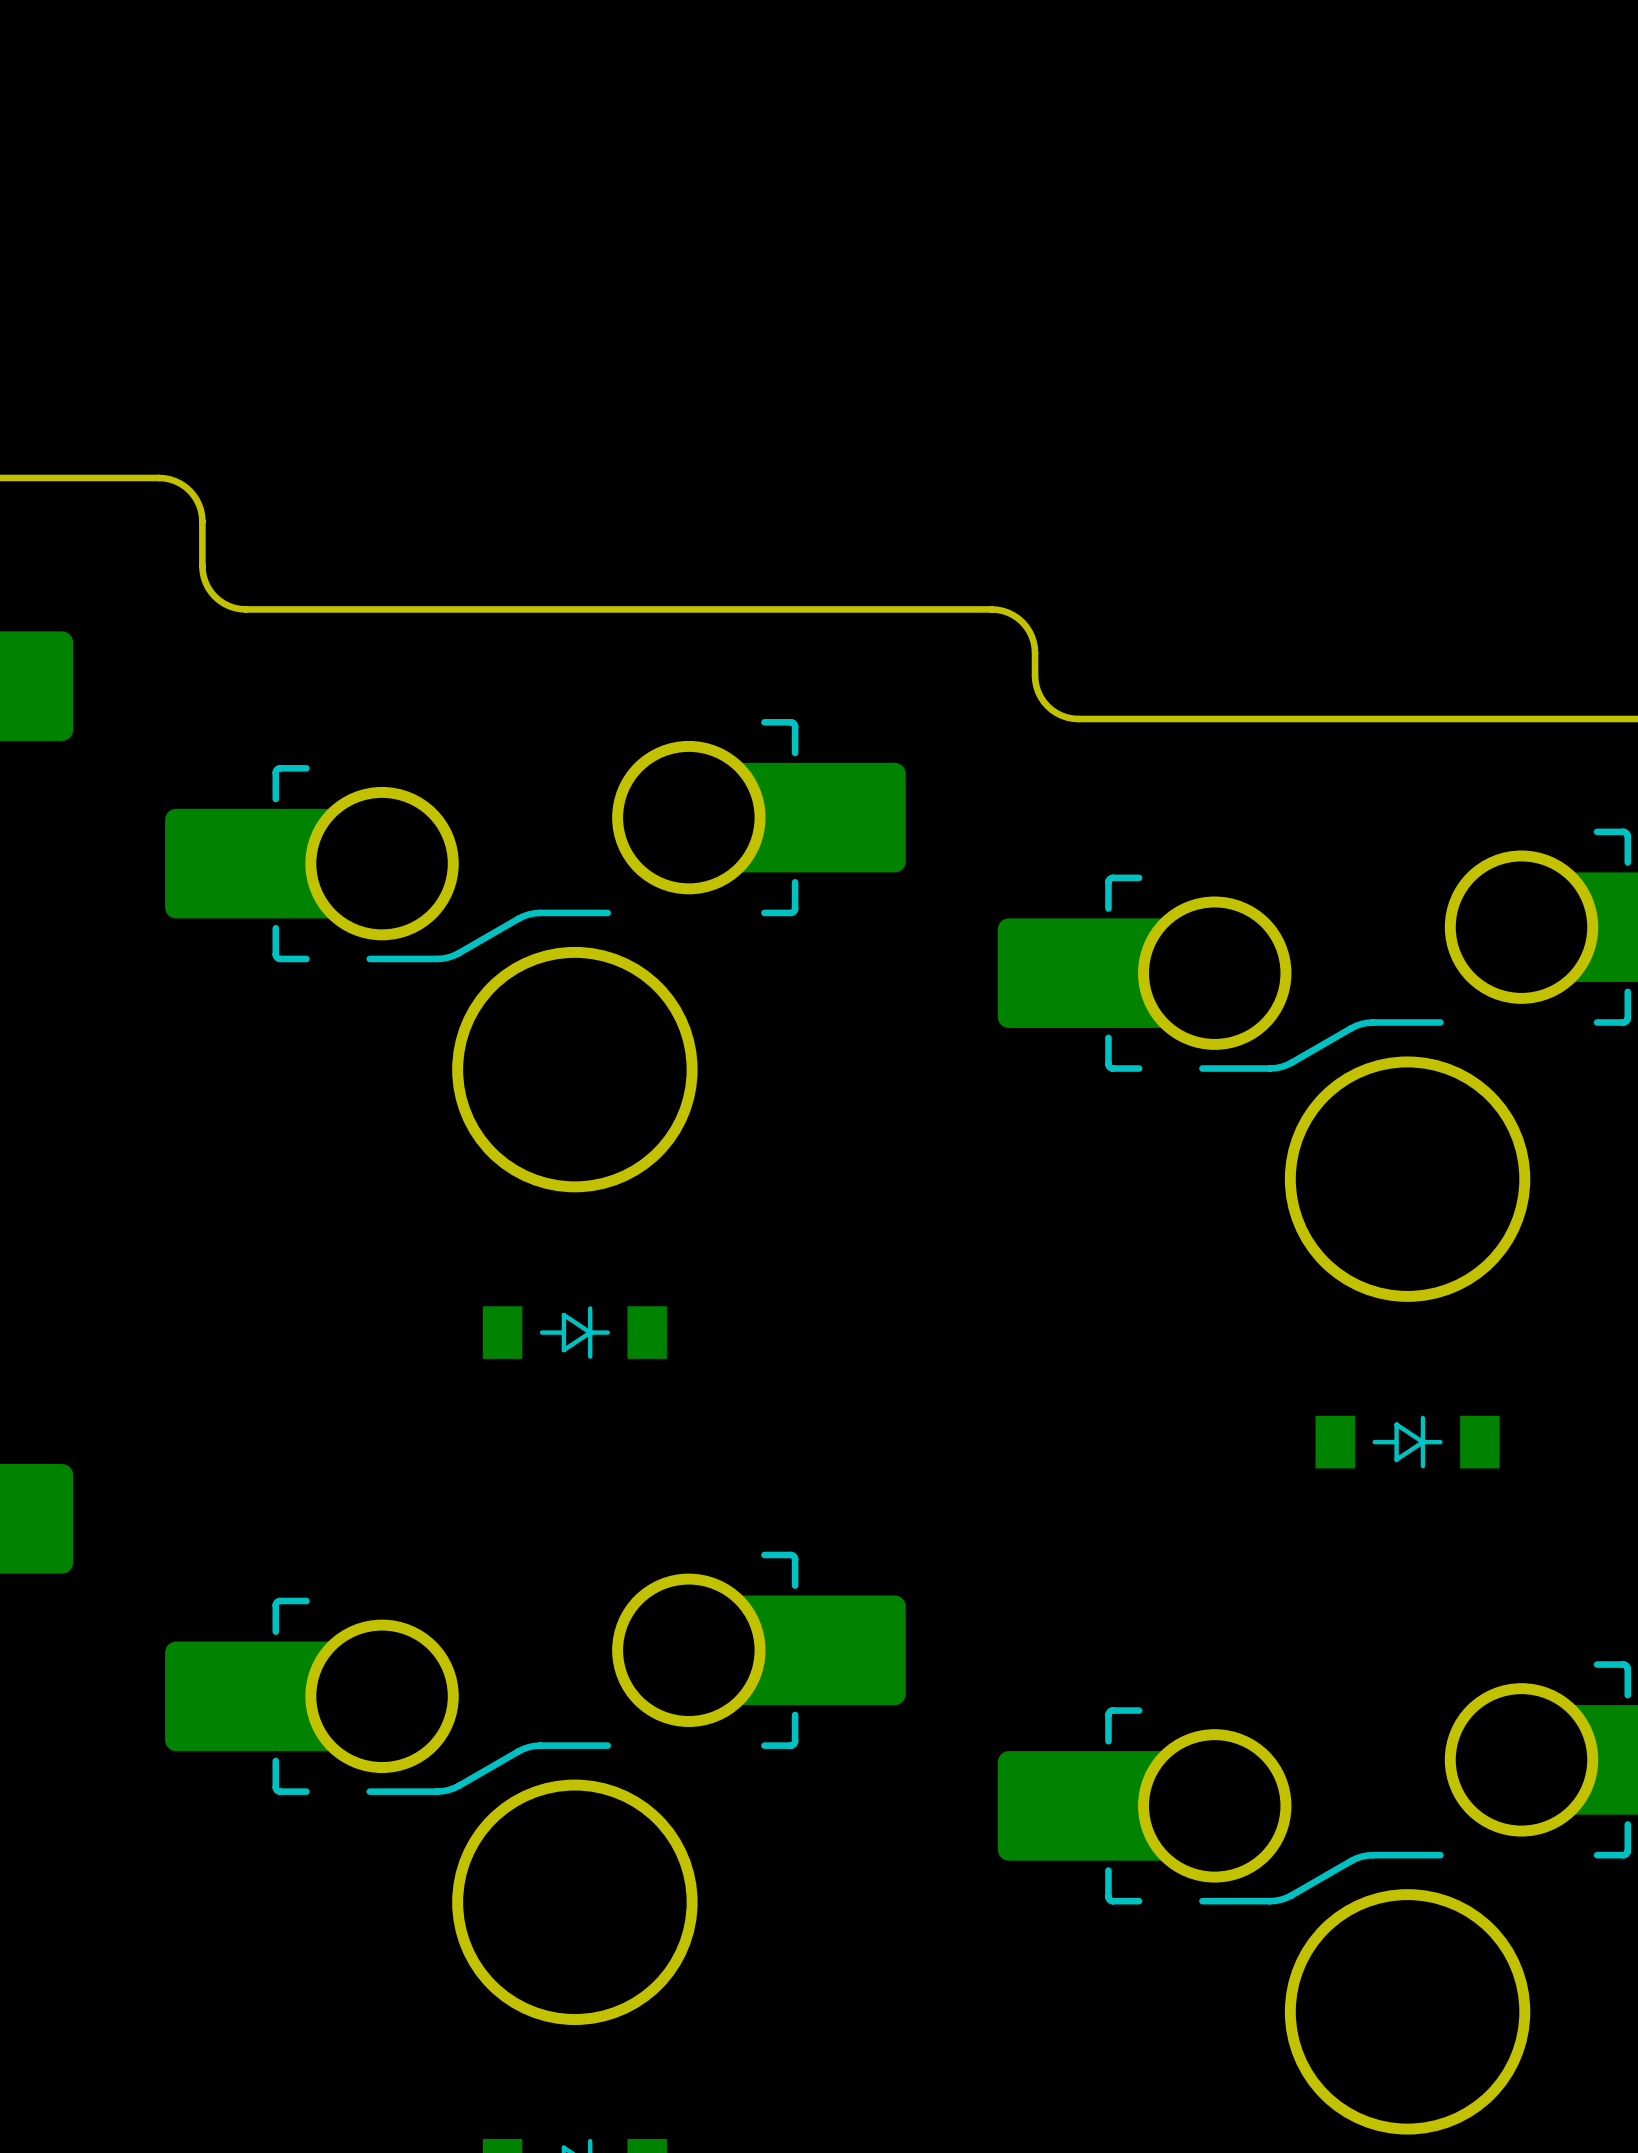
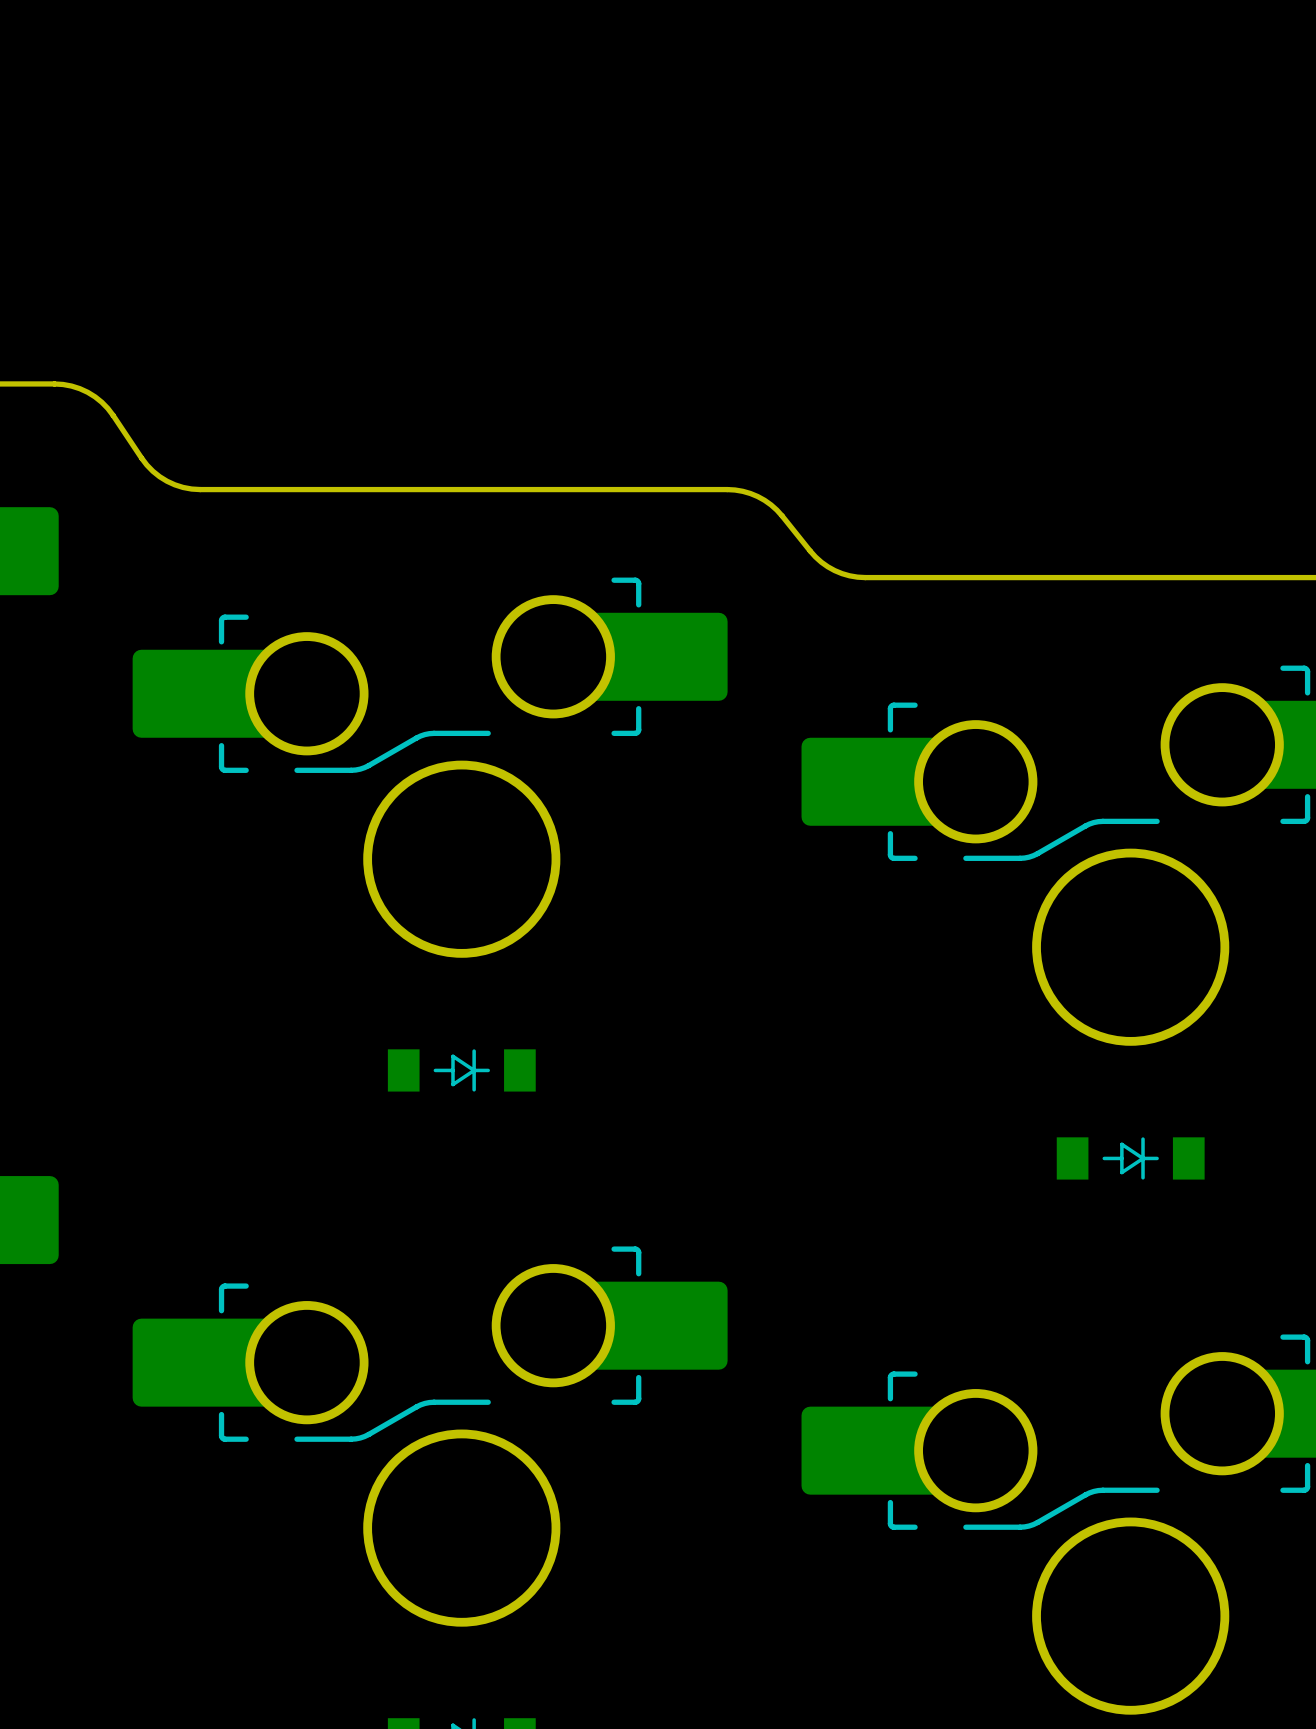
board edge: (67, 477) (164, 478) (185, 486) (193, 494) (200, 510) (202, 571) (208, 587) (224, 603) (234, 607) (249, 609) -> (54, 383) (71, 386) (95, 396) (107, 408) (141, 458) (152, 471) (174, 484) (200, 489)
board edge: (905, 609) (991, 609) (1013, 615) (1026, 626) (1033, 641) (1035, 681) (1040, 697) (1056, 713) (1078, 719) -> (727, 489) (750, 493) (771, 504) (815, 557) (827, 566) (849, 575) (866, 577)

